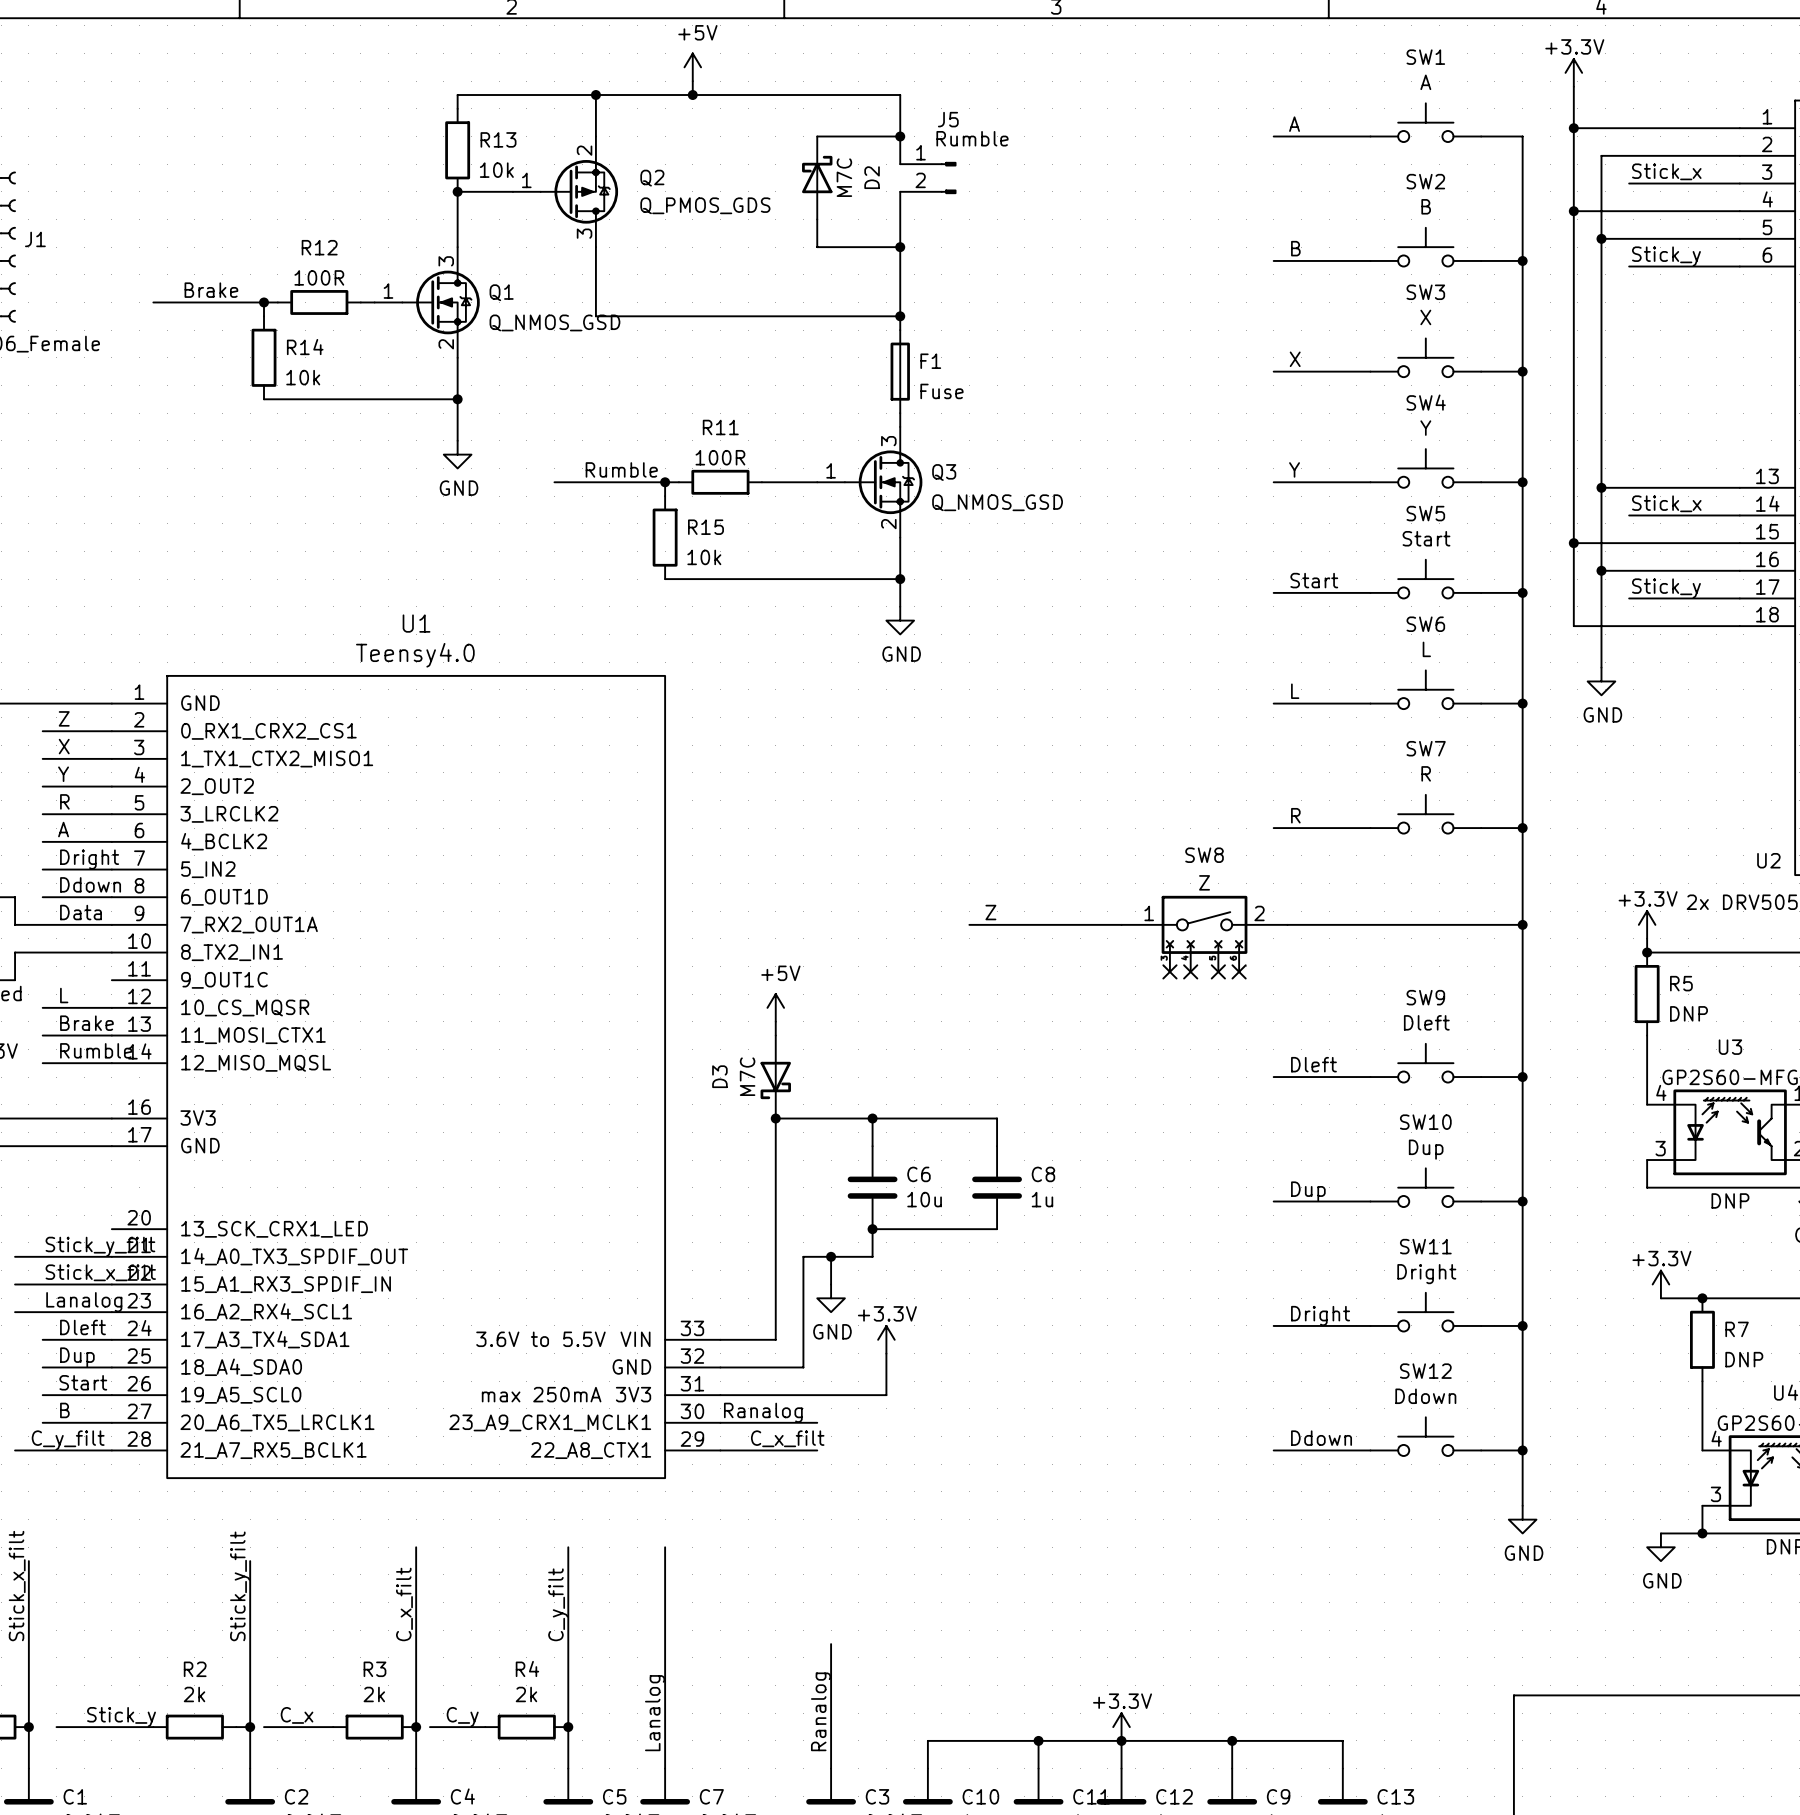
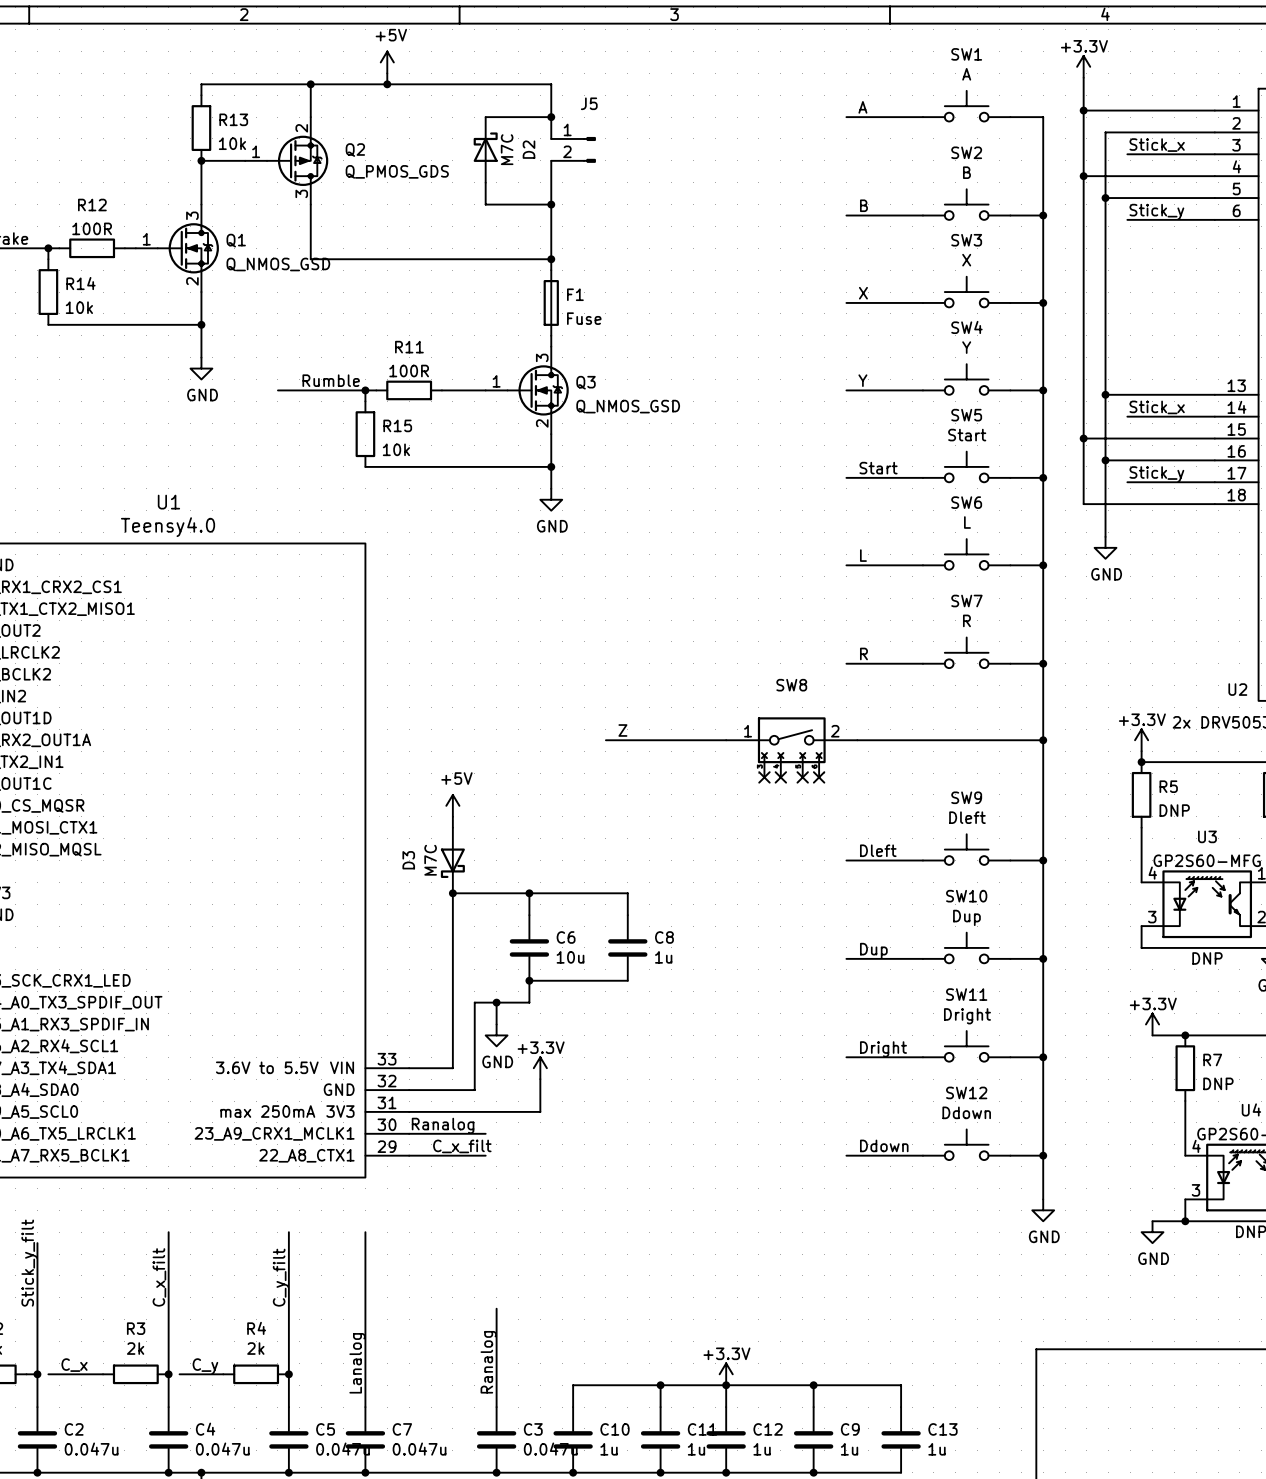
J5 value: Rumble (972, 138) -> none
SW8 value: Z (1204, 882) -> none

